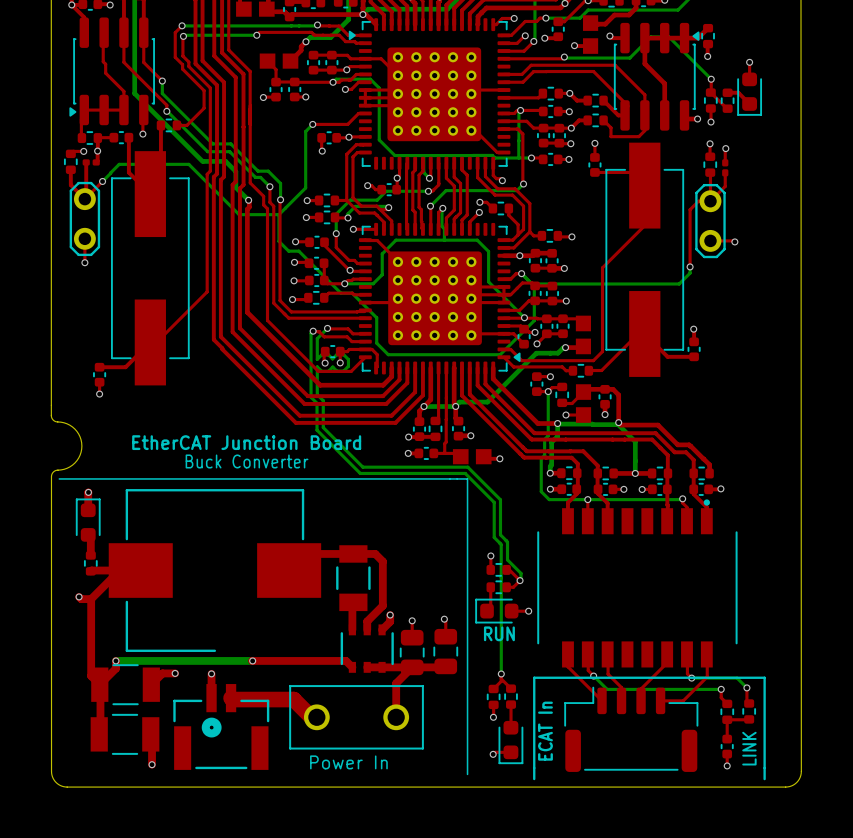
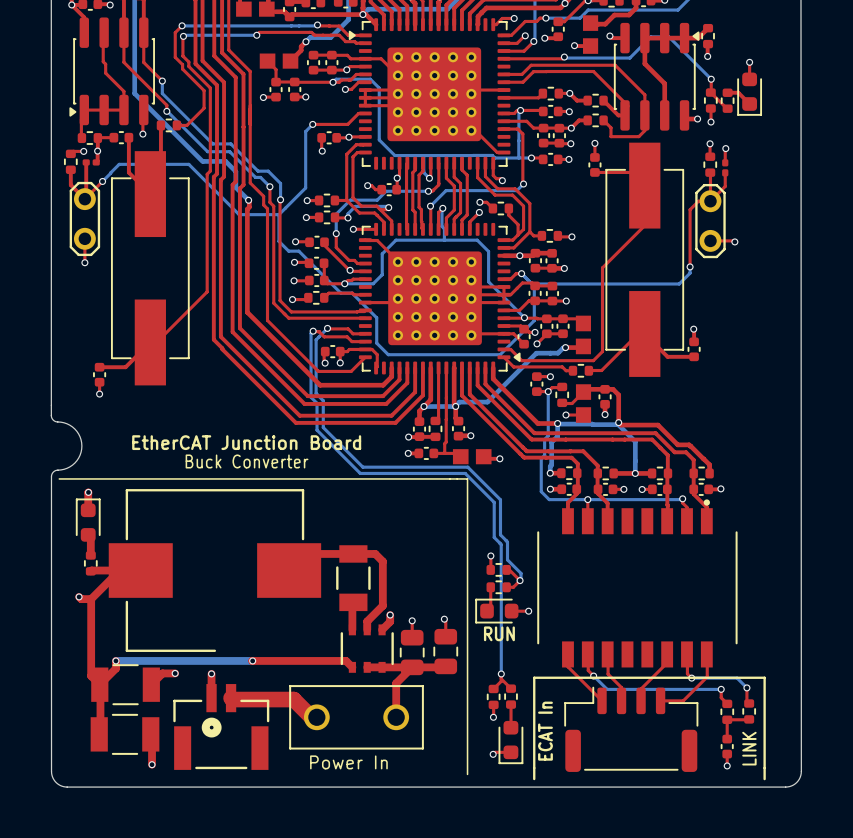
bottom track: (317, 338) (317, 359) (321, 354) (328, 354) (332, 358) (336, 354) (343, 354) (348, 359) (348, 366) (343, 371) (336, 371) (332, 367) (328, 371) (321, 371) (317, 366) (317, 394) -> (317, 338) (317, 394)

